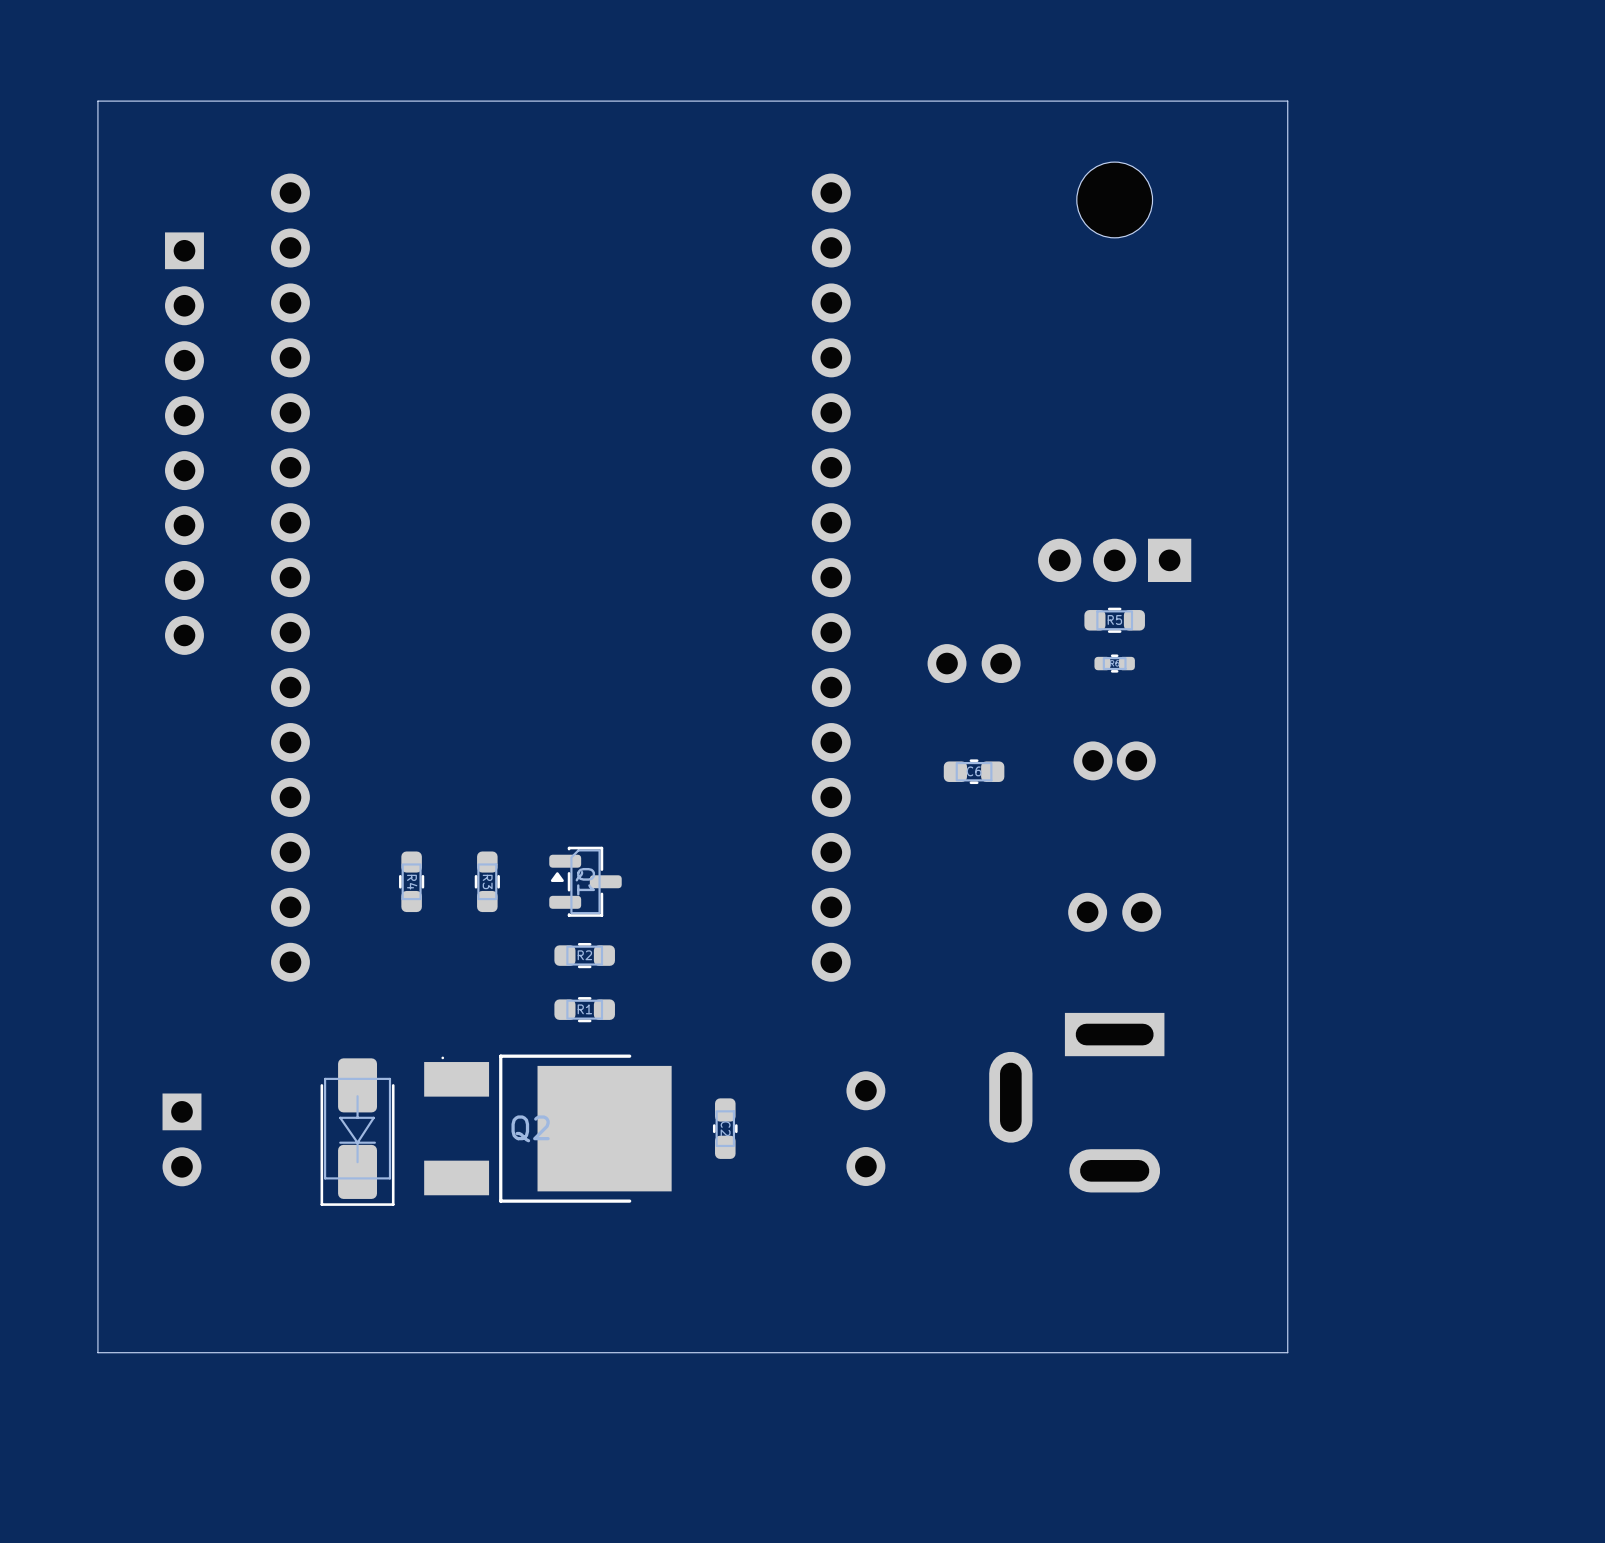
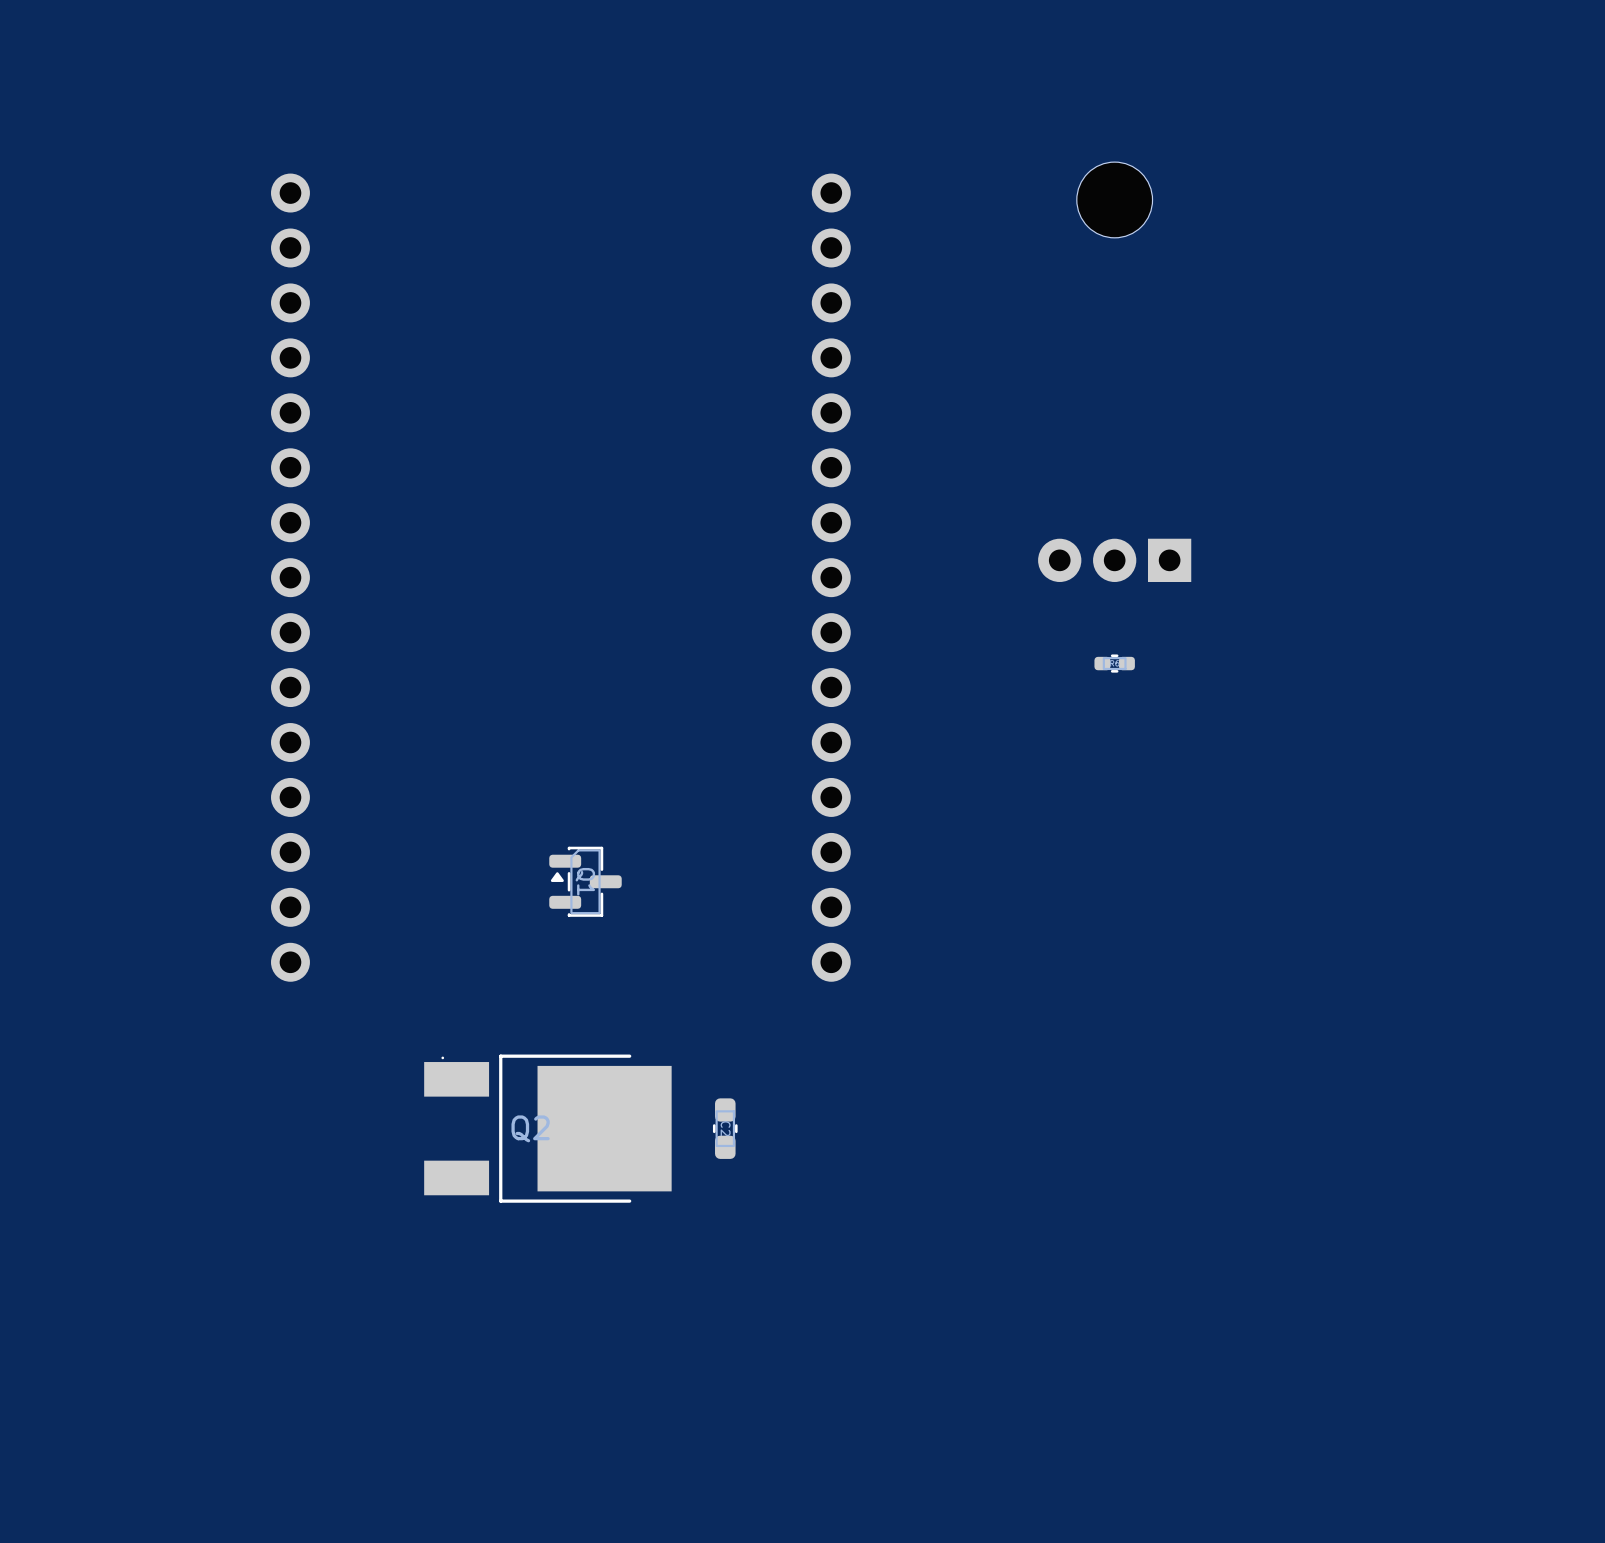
board edge: (1287, 101) (97, 101) (97, 1352) (1287, 1352) (1287, 101) -> none
part: (184, 443) -> none
R5: (1114, 620) -> none
part: (974, 663) -> none
part: (1114, 760) -> none
C6: (974, 771) -> none
R4: (411, 881) -> none
R3: (487, 881) -> none
part: (1114, 912) -> none
R2: (584, 955) -> none
R1: (584, 1009) -> none
part: (1076, 1102) -> none
part: (865, 1128) -> none
part: (357, 1132) -> none
part: (181, 1139) -> none

